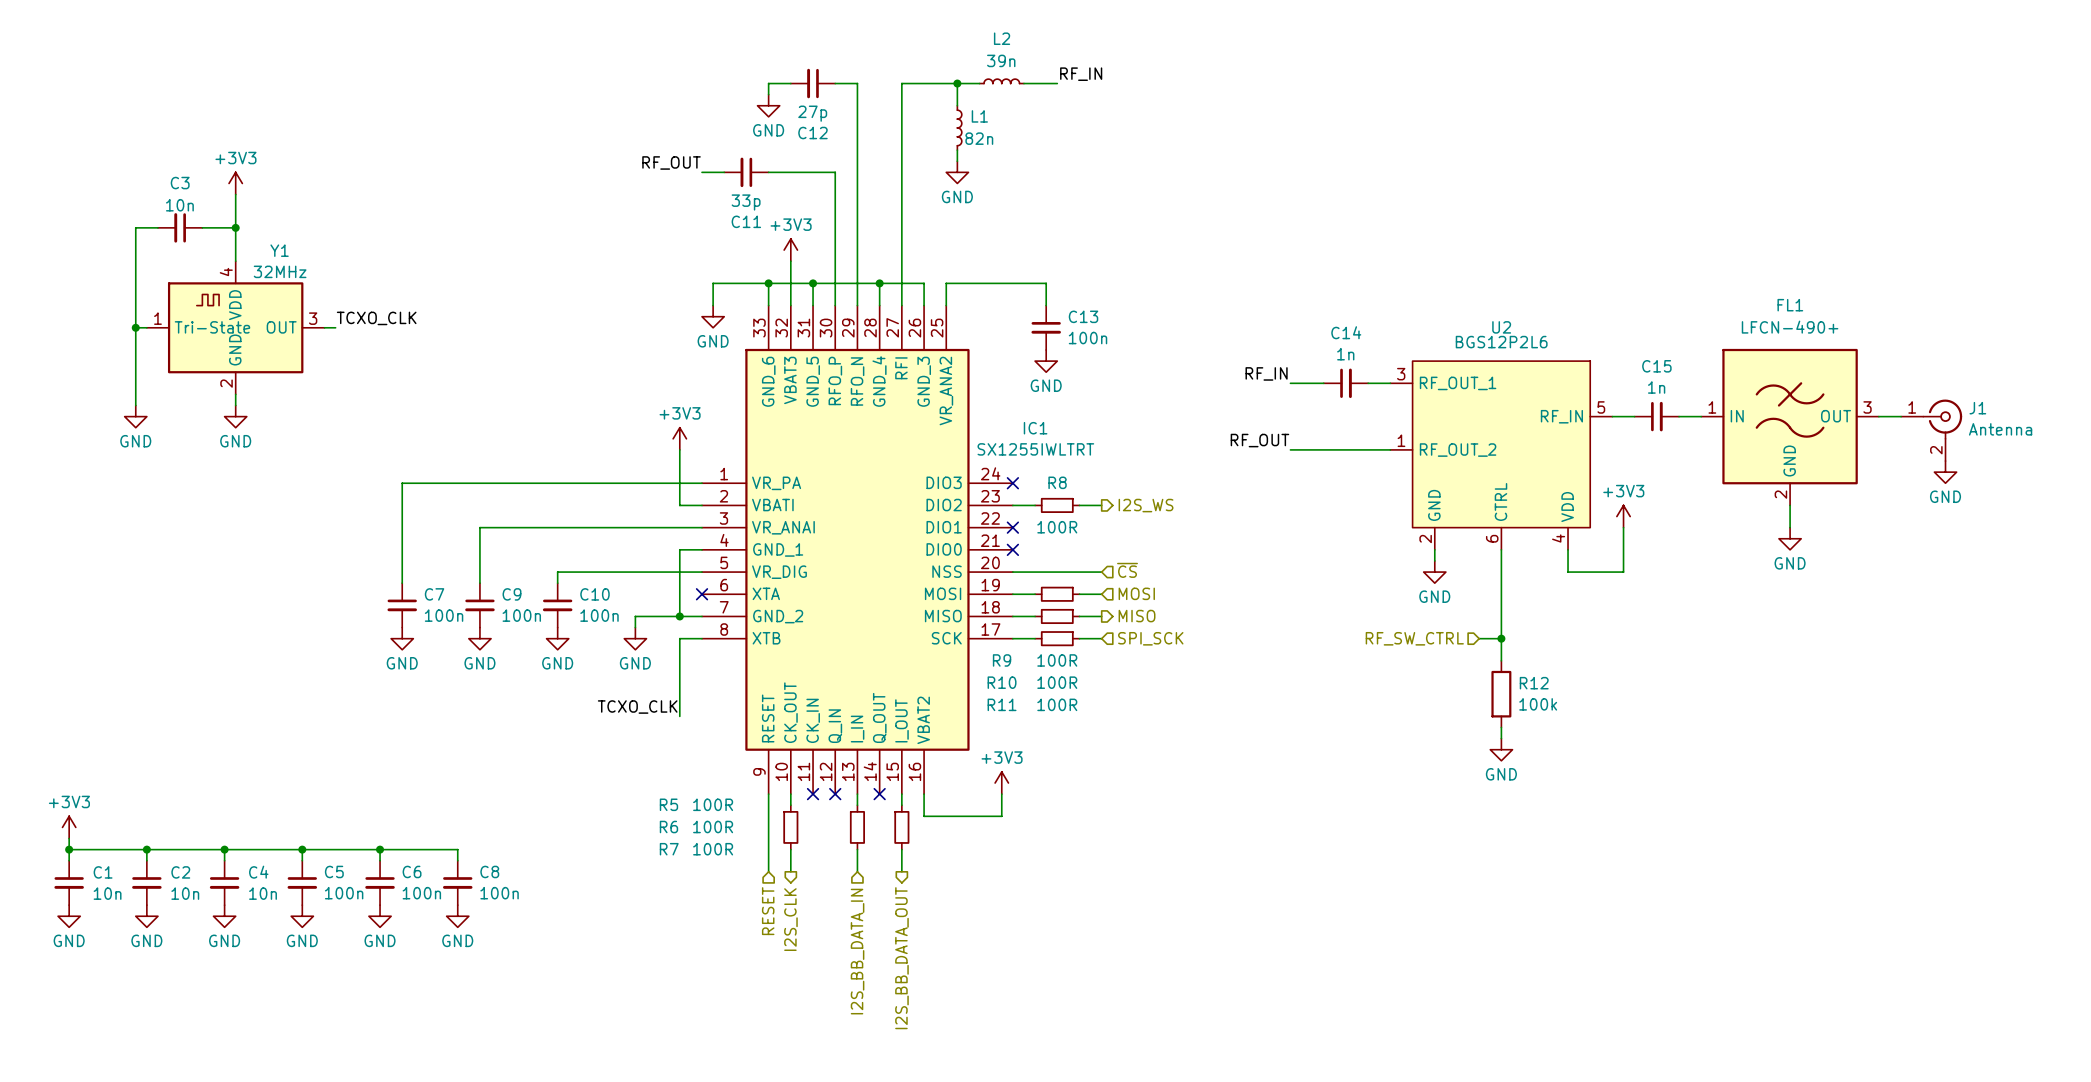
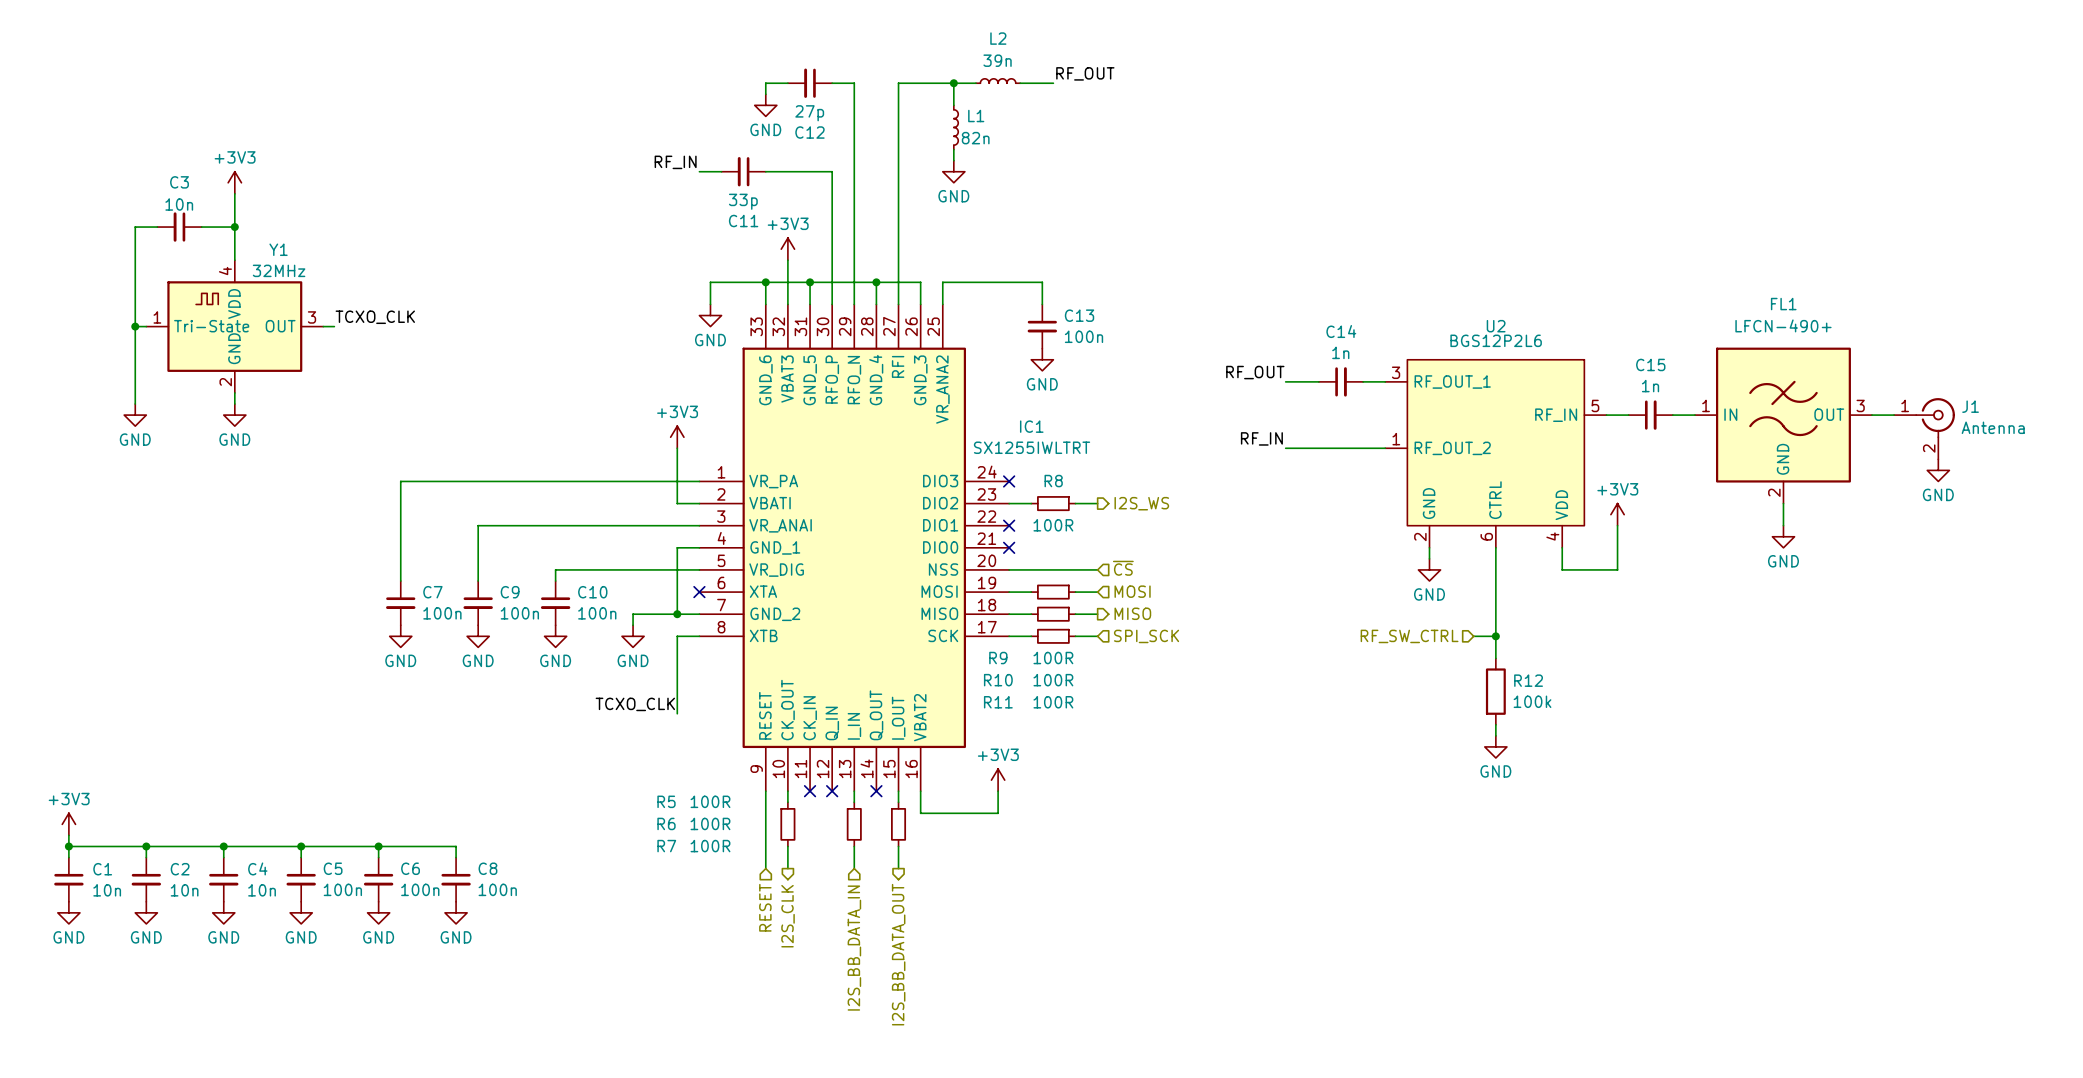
label: RF_IN (1081, 74) -> RF_OUT (1085, 73)
label: RF_OUT (671, 162) -> RF_IN (675, 162)
label: RF_IN (1266, 373) -> RF_OUT (1255, 372)
label: RF_OUT (1259, 440) -> RF_IN (1261, 438)

